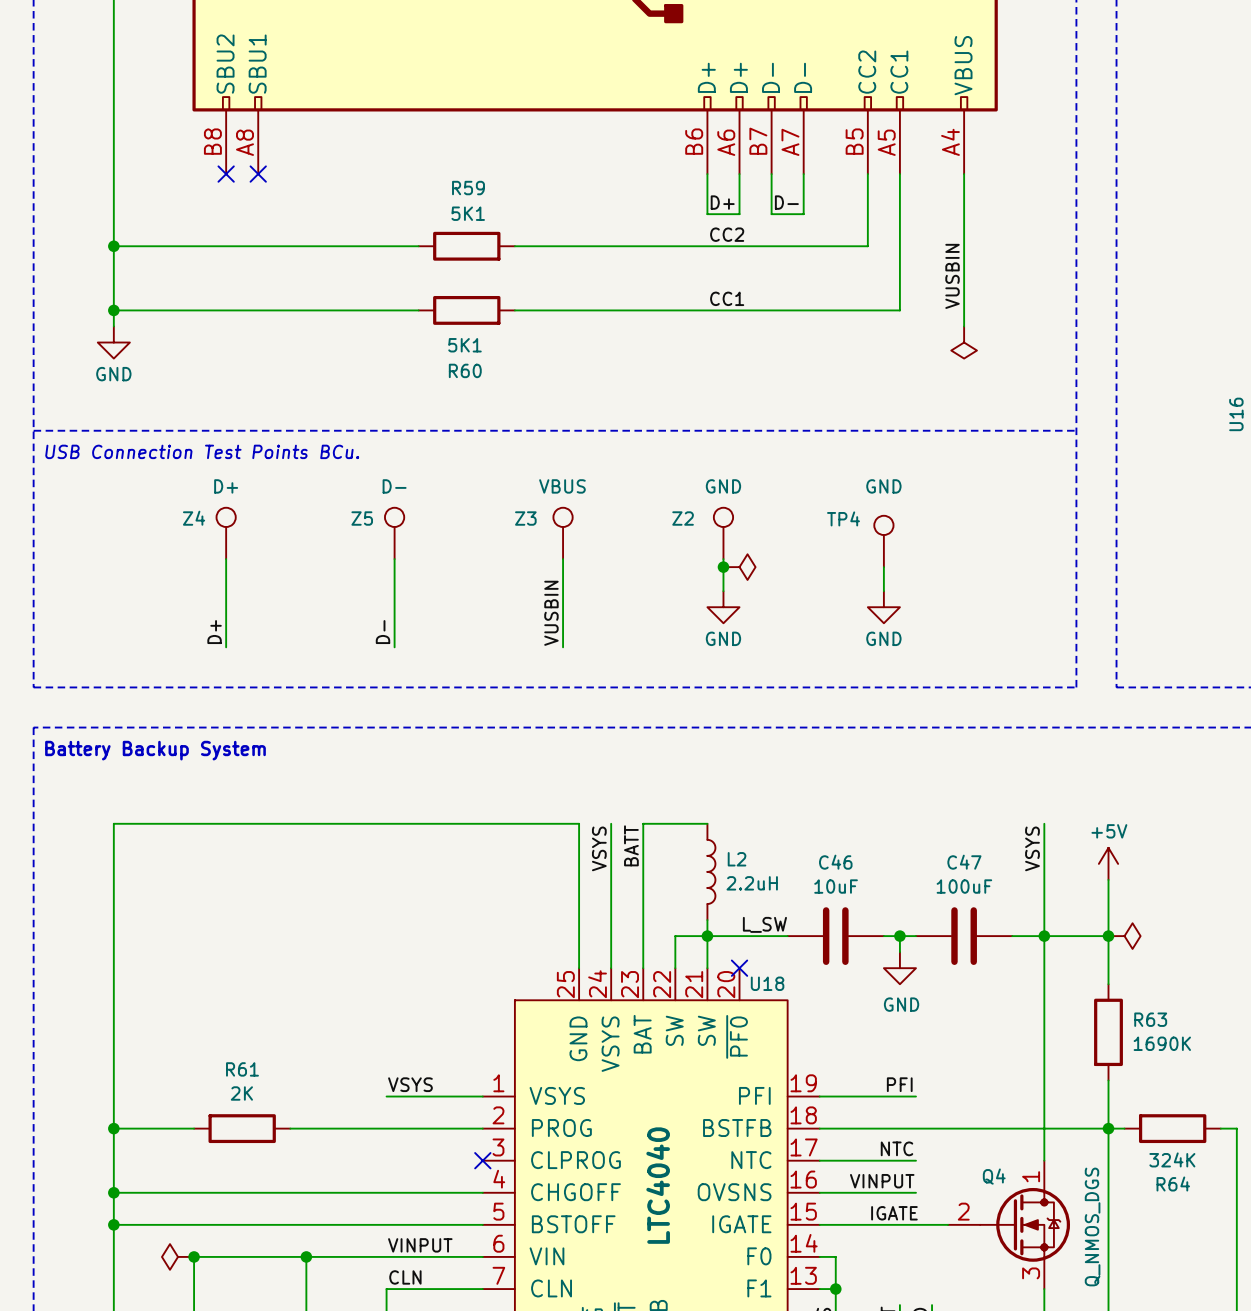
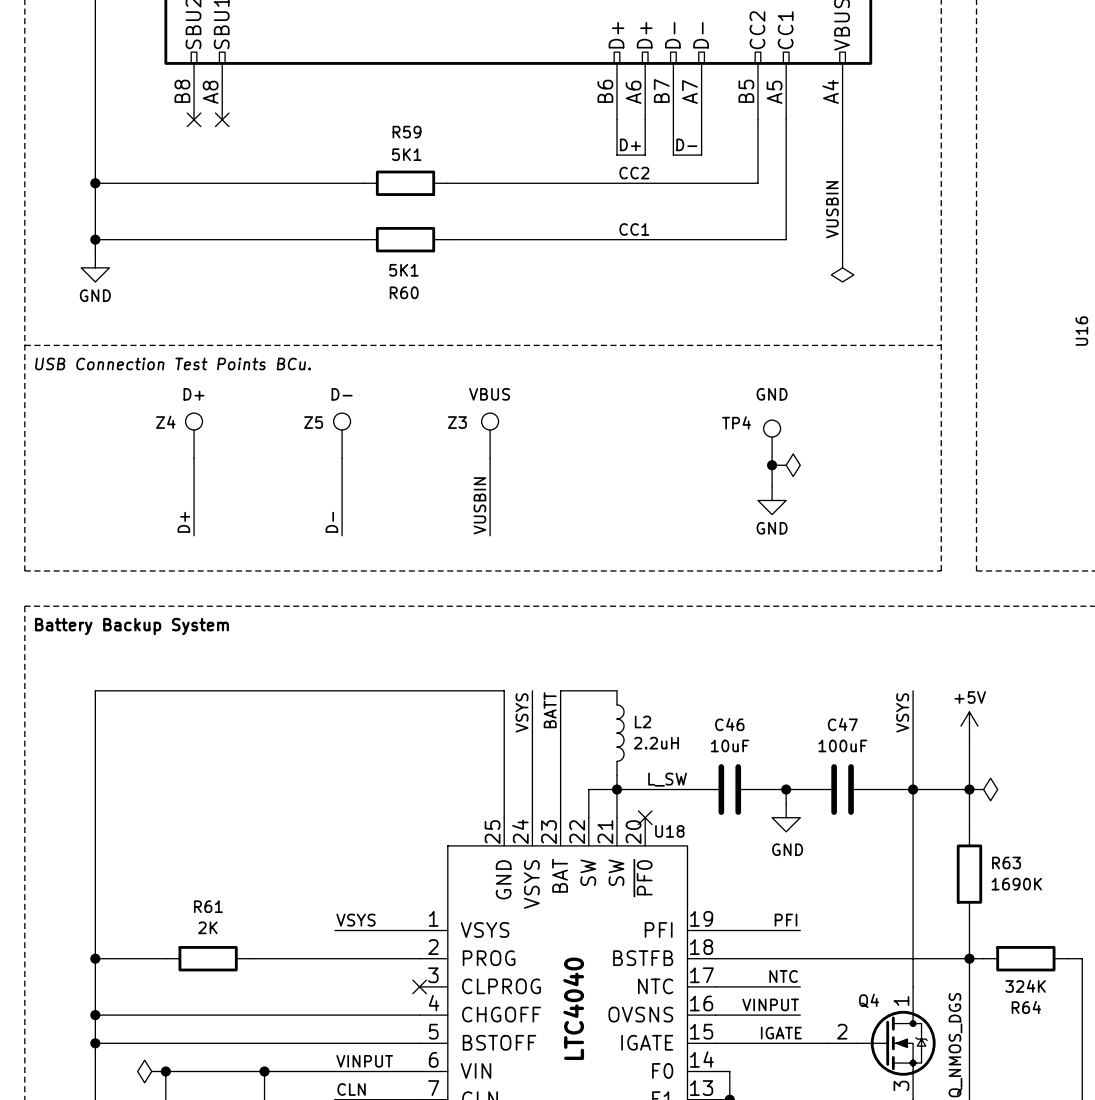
Z2: GND (723, 533) -> none
wire: (723, 559) (723, 591) -> none
junction: (723, 567) -> none
power symbol position: (739, 567) -> (786, 465)
junction: none -> (772, 465)
power symbol: GND (723, 607) -> none

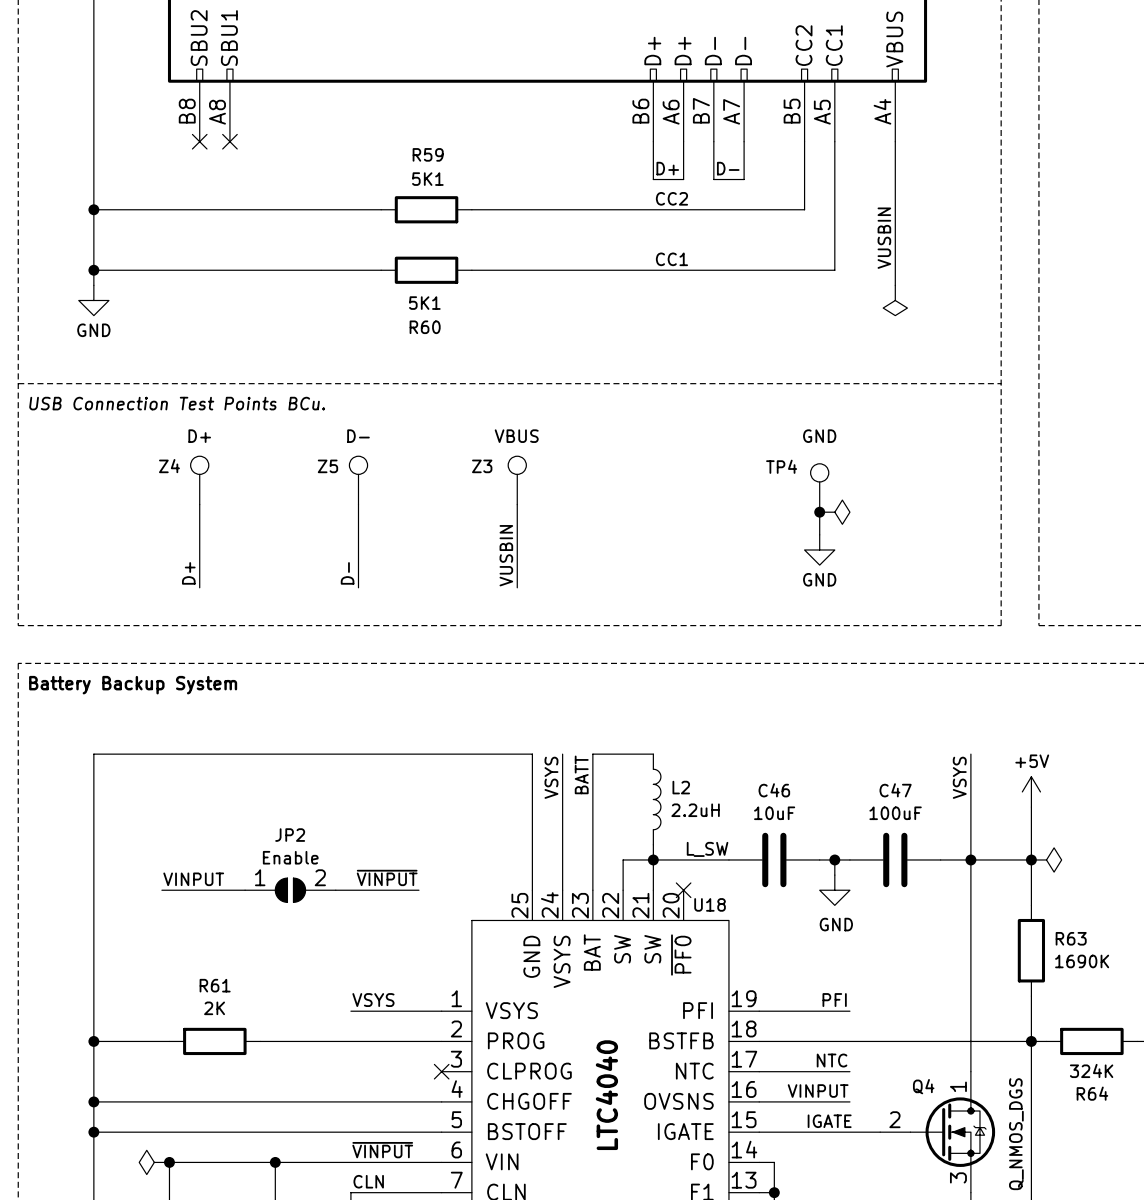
label: none -> ~{VINPUT} (387, 877)
label: none -> VINPUT (193, 879)
wire: none -> (161, 890) (245, 890)
JP2: none -> Enable (290, 890)
wire: none -> (335, 890) (418, 890)
label: VINPUT (364, 1061) -> ~{VINPUT} (382, 1150)

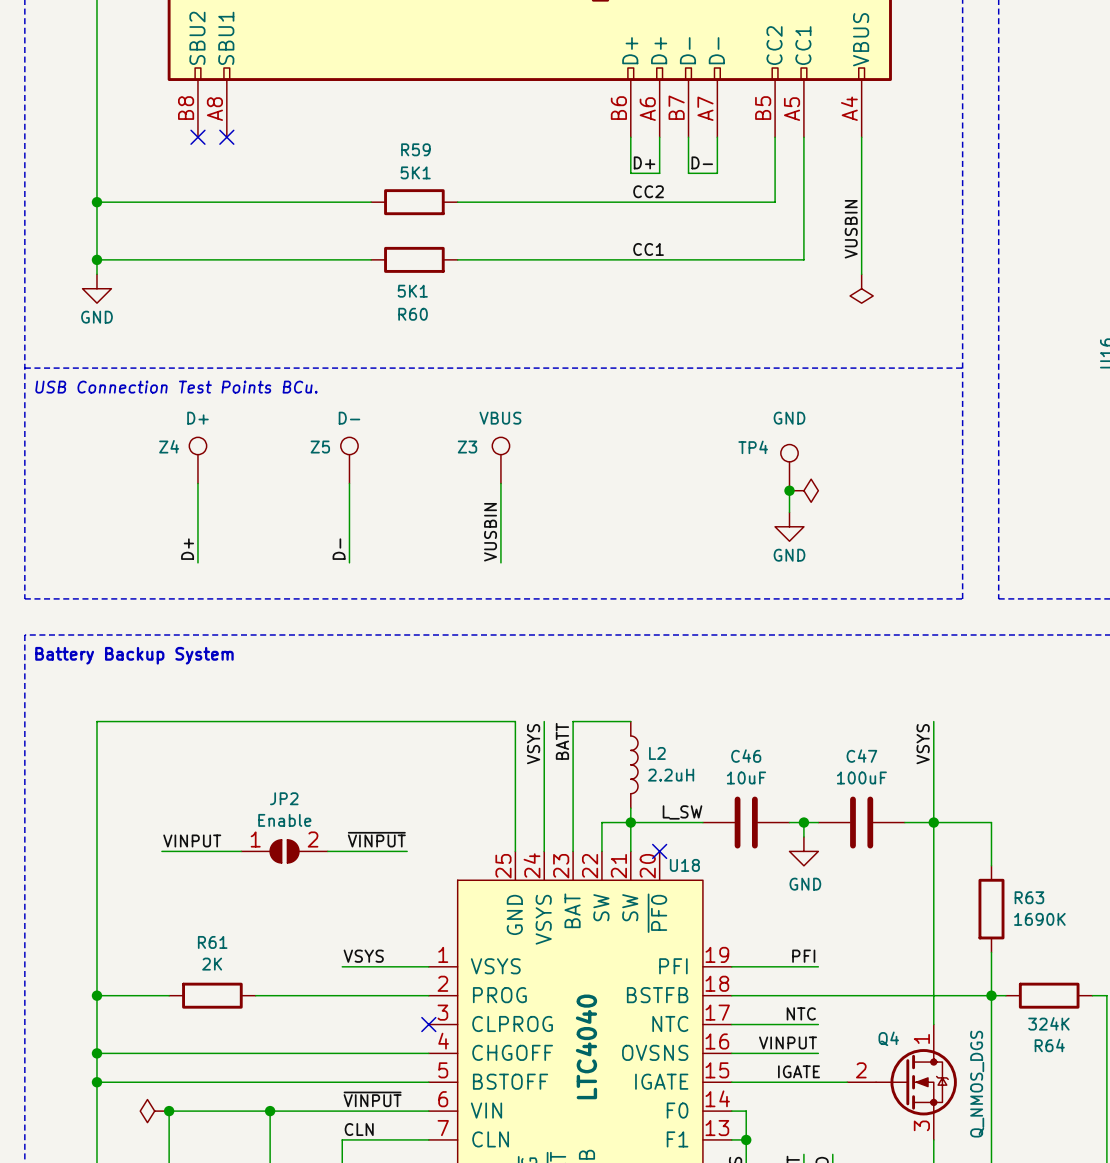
power symbol: +5V (1031, 791) -> none
wire: (1031, 807) (1031, 859) -> none
junction: (1031, 859) -> none
power symbol: (1046, 859) -> none

